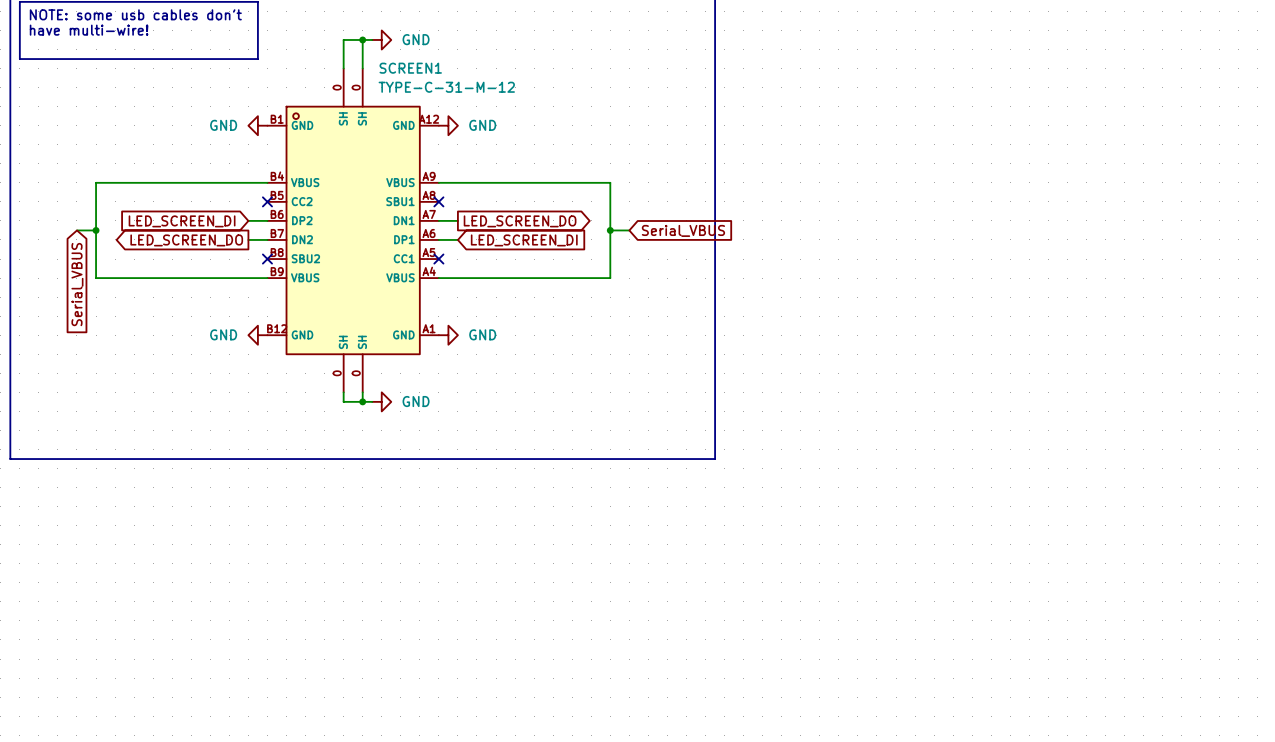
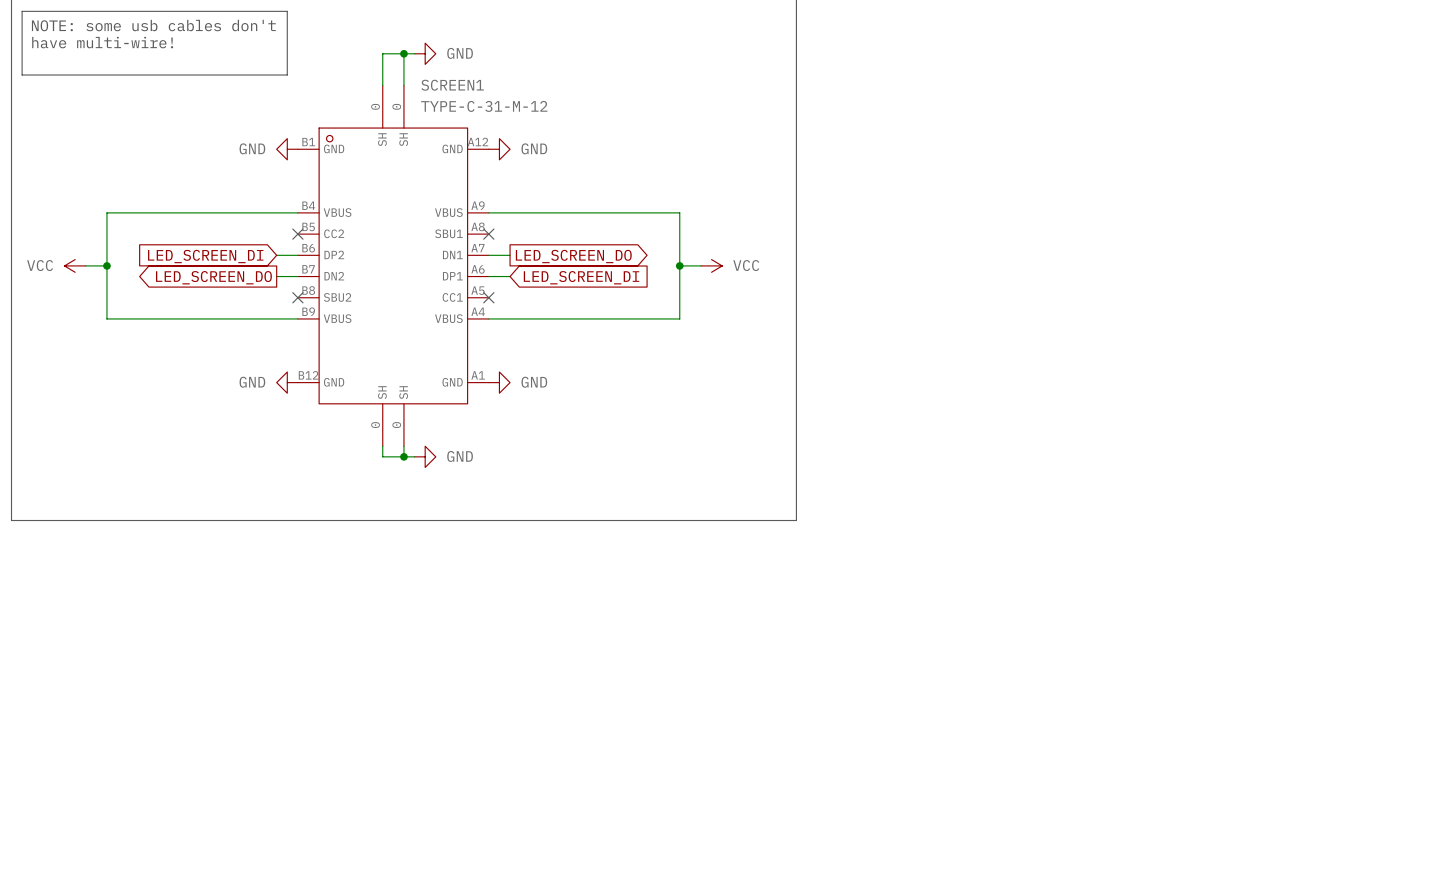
power symbol: none -> VCC (75, 265)
power symbol: none -> VCC (711, 265)
global label: Serial_VBUS (683, 230) -> none
global label: Serial_VBUS (77, 284) -> none

